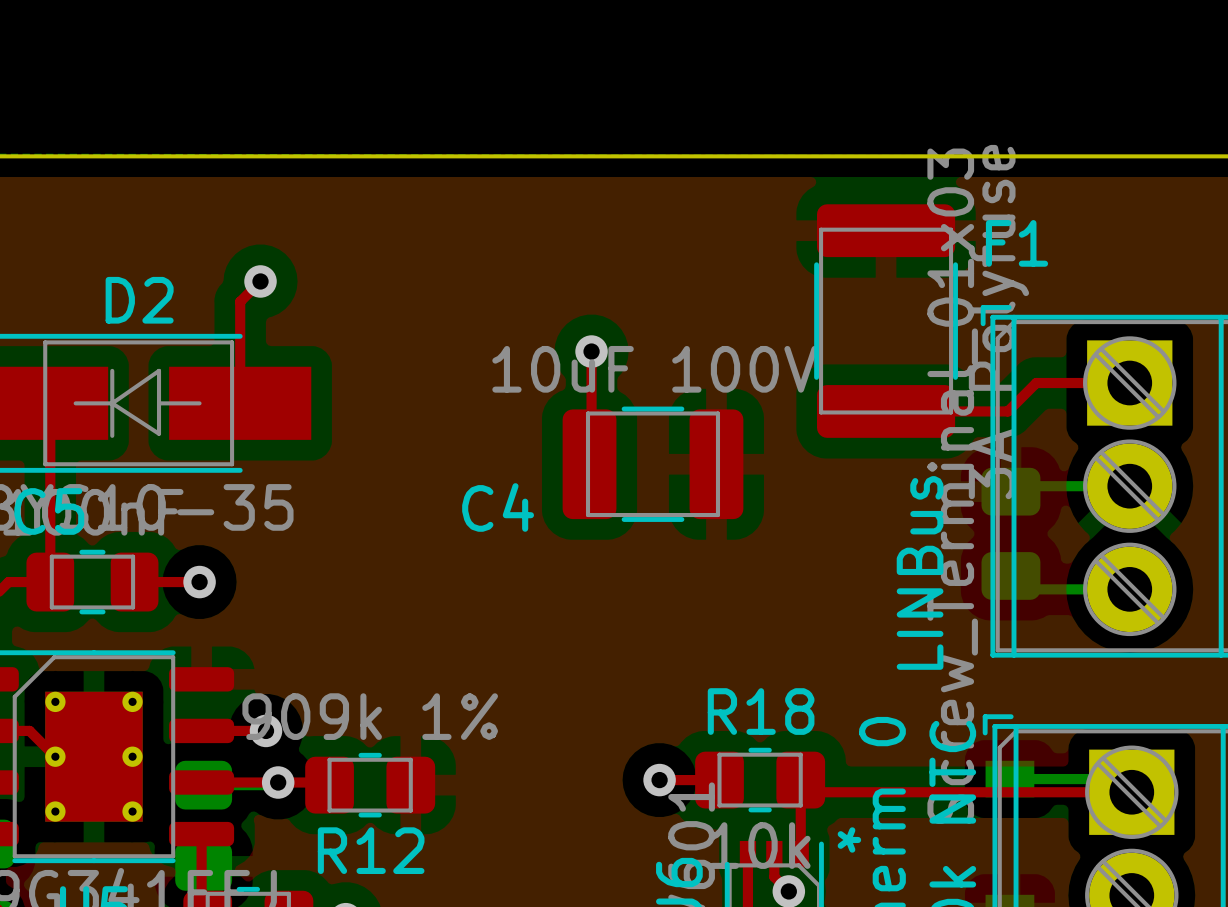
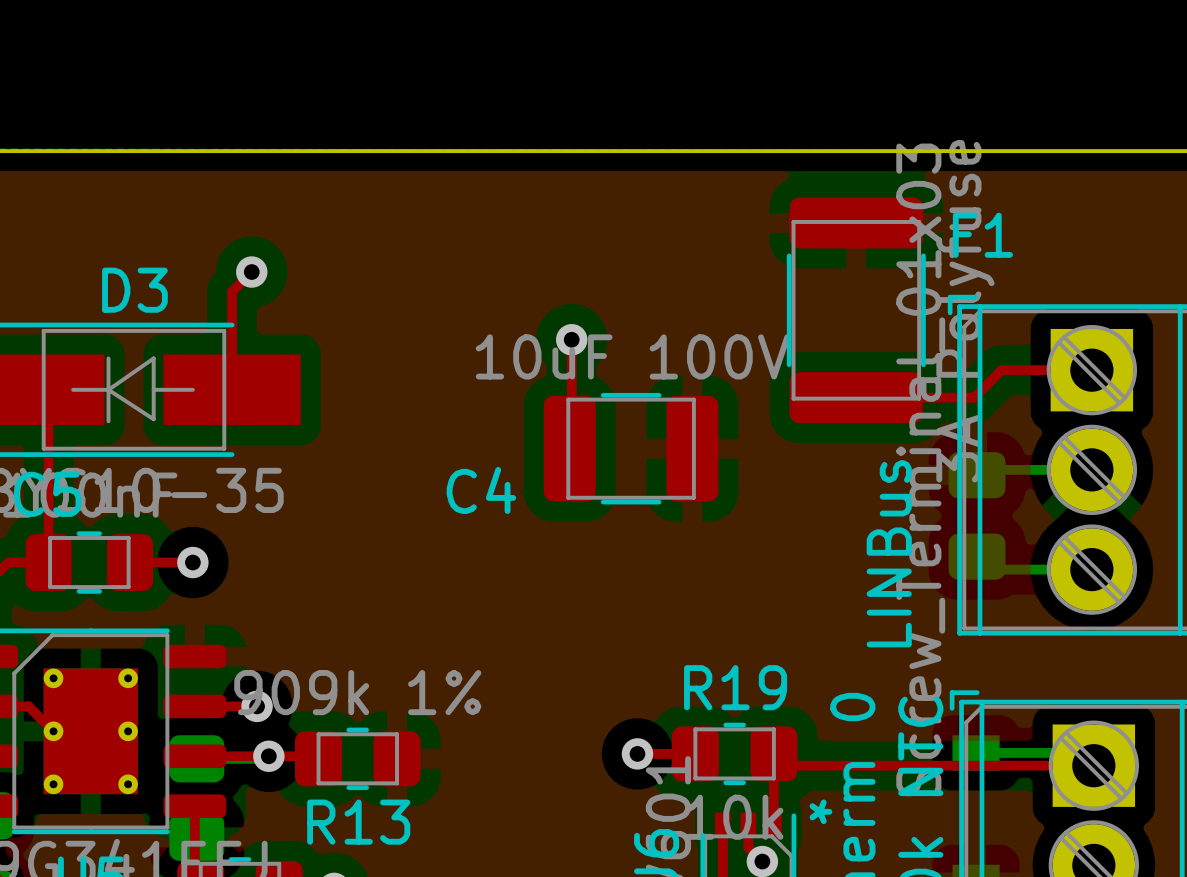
D2 name: D2 (139, 300) -> D3 (134, 290)
R18 name: R18 (761, 711) -> R19 (735, 687)
R12 name: R12 (371, 850) -> R13 (358, 822)

